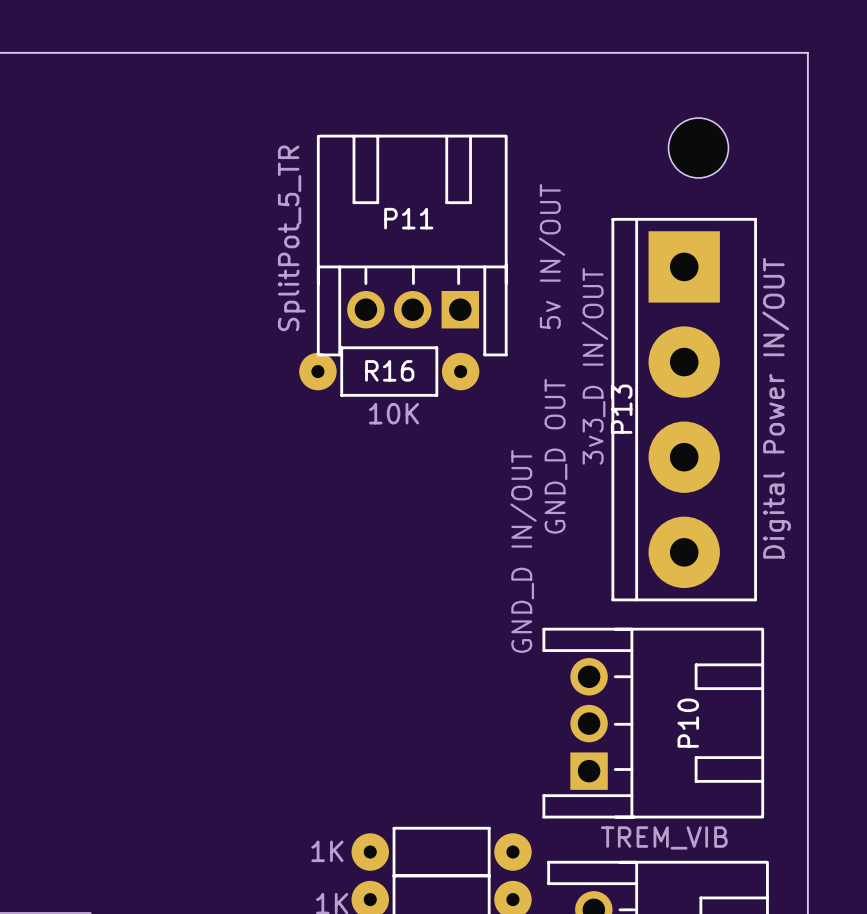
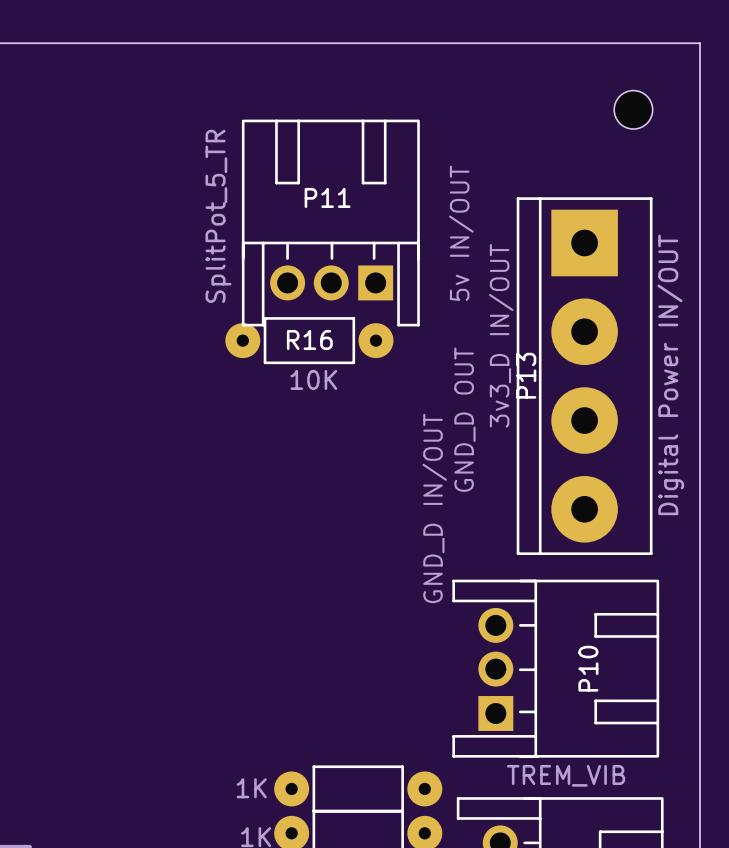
part: none -> (633, 109)
part: (698, 147) -> none

